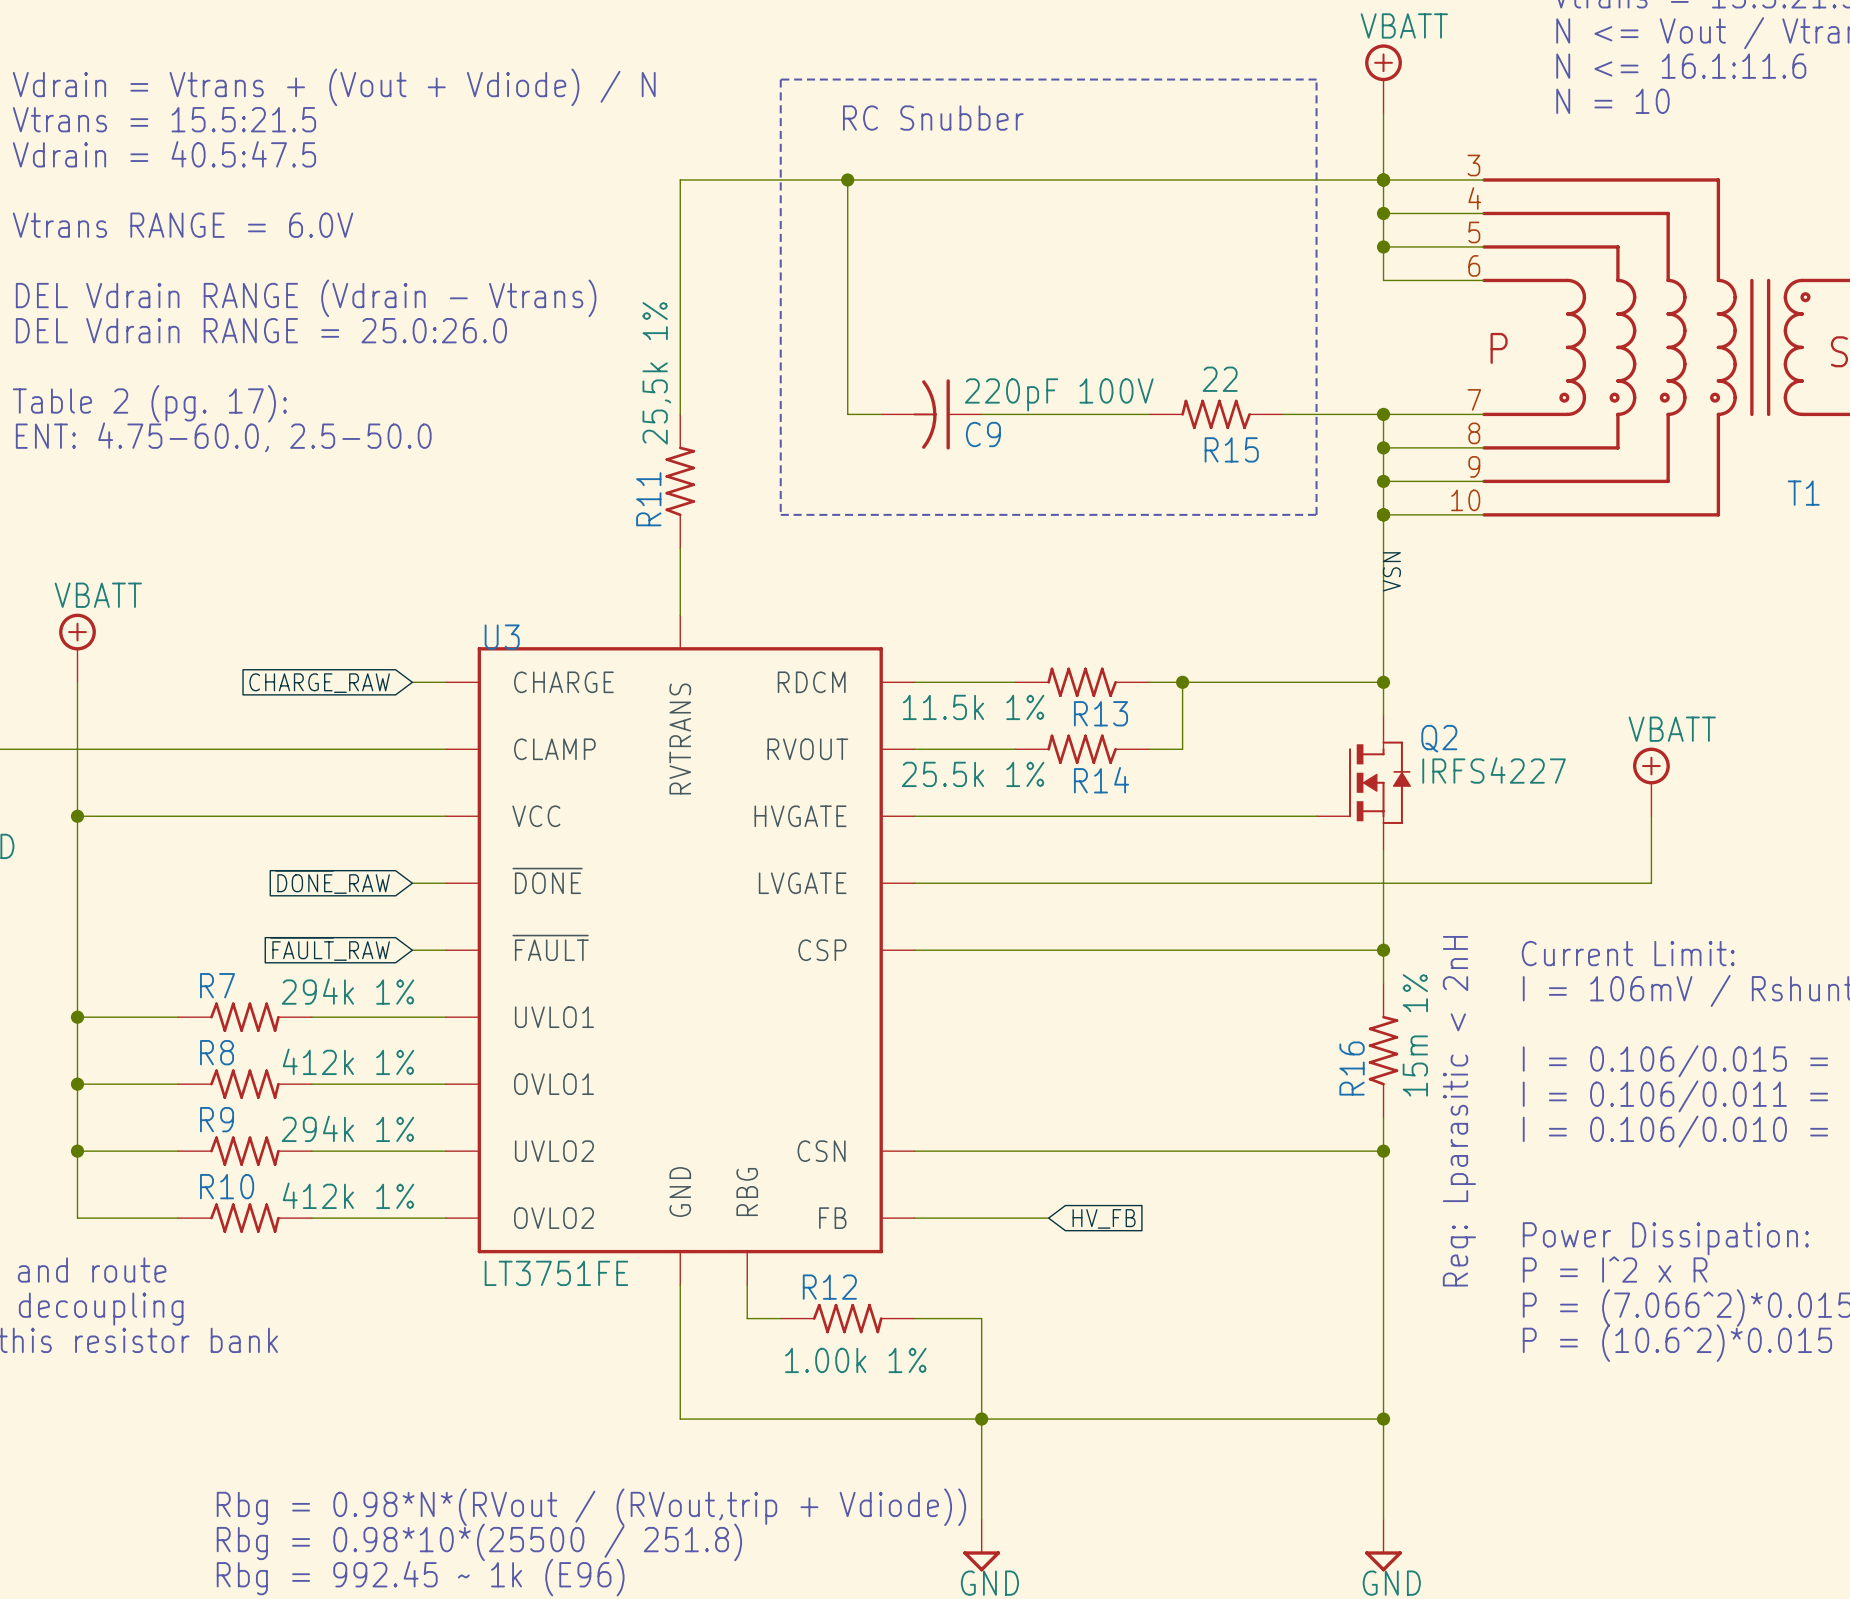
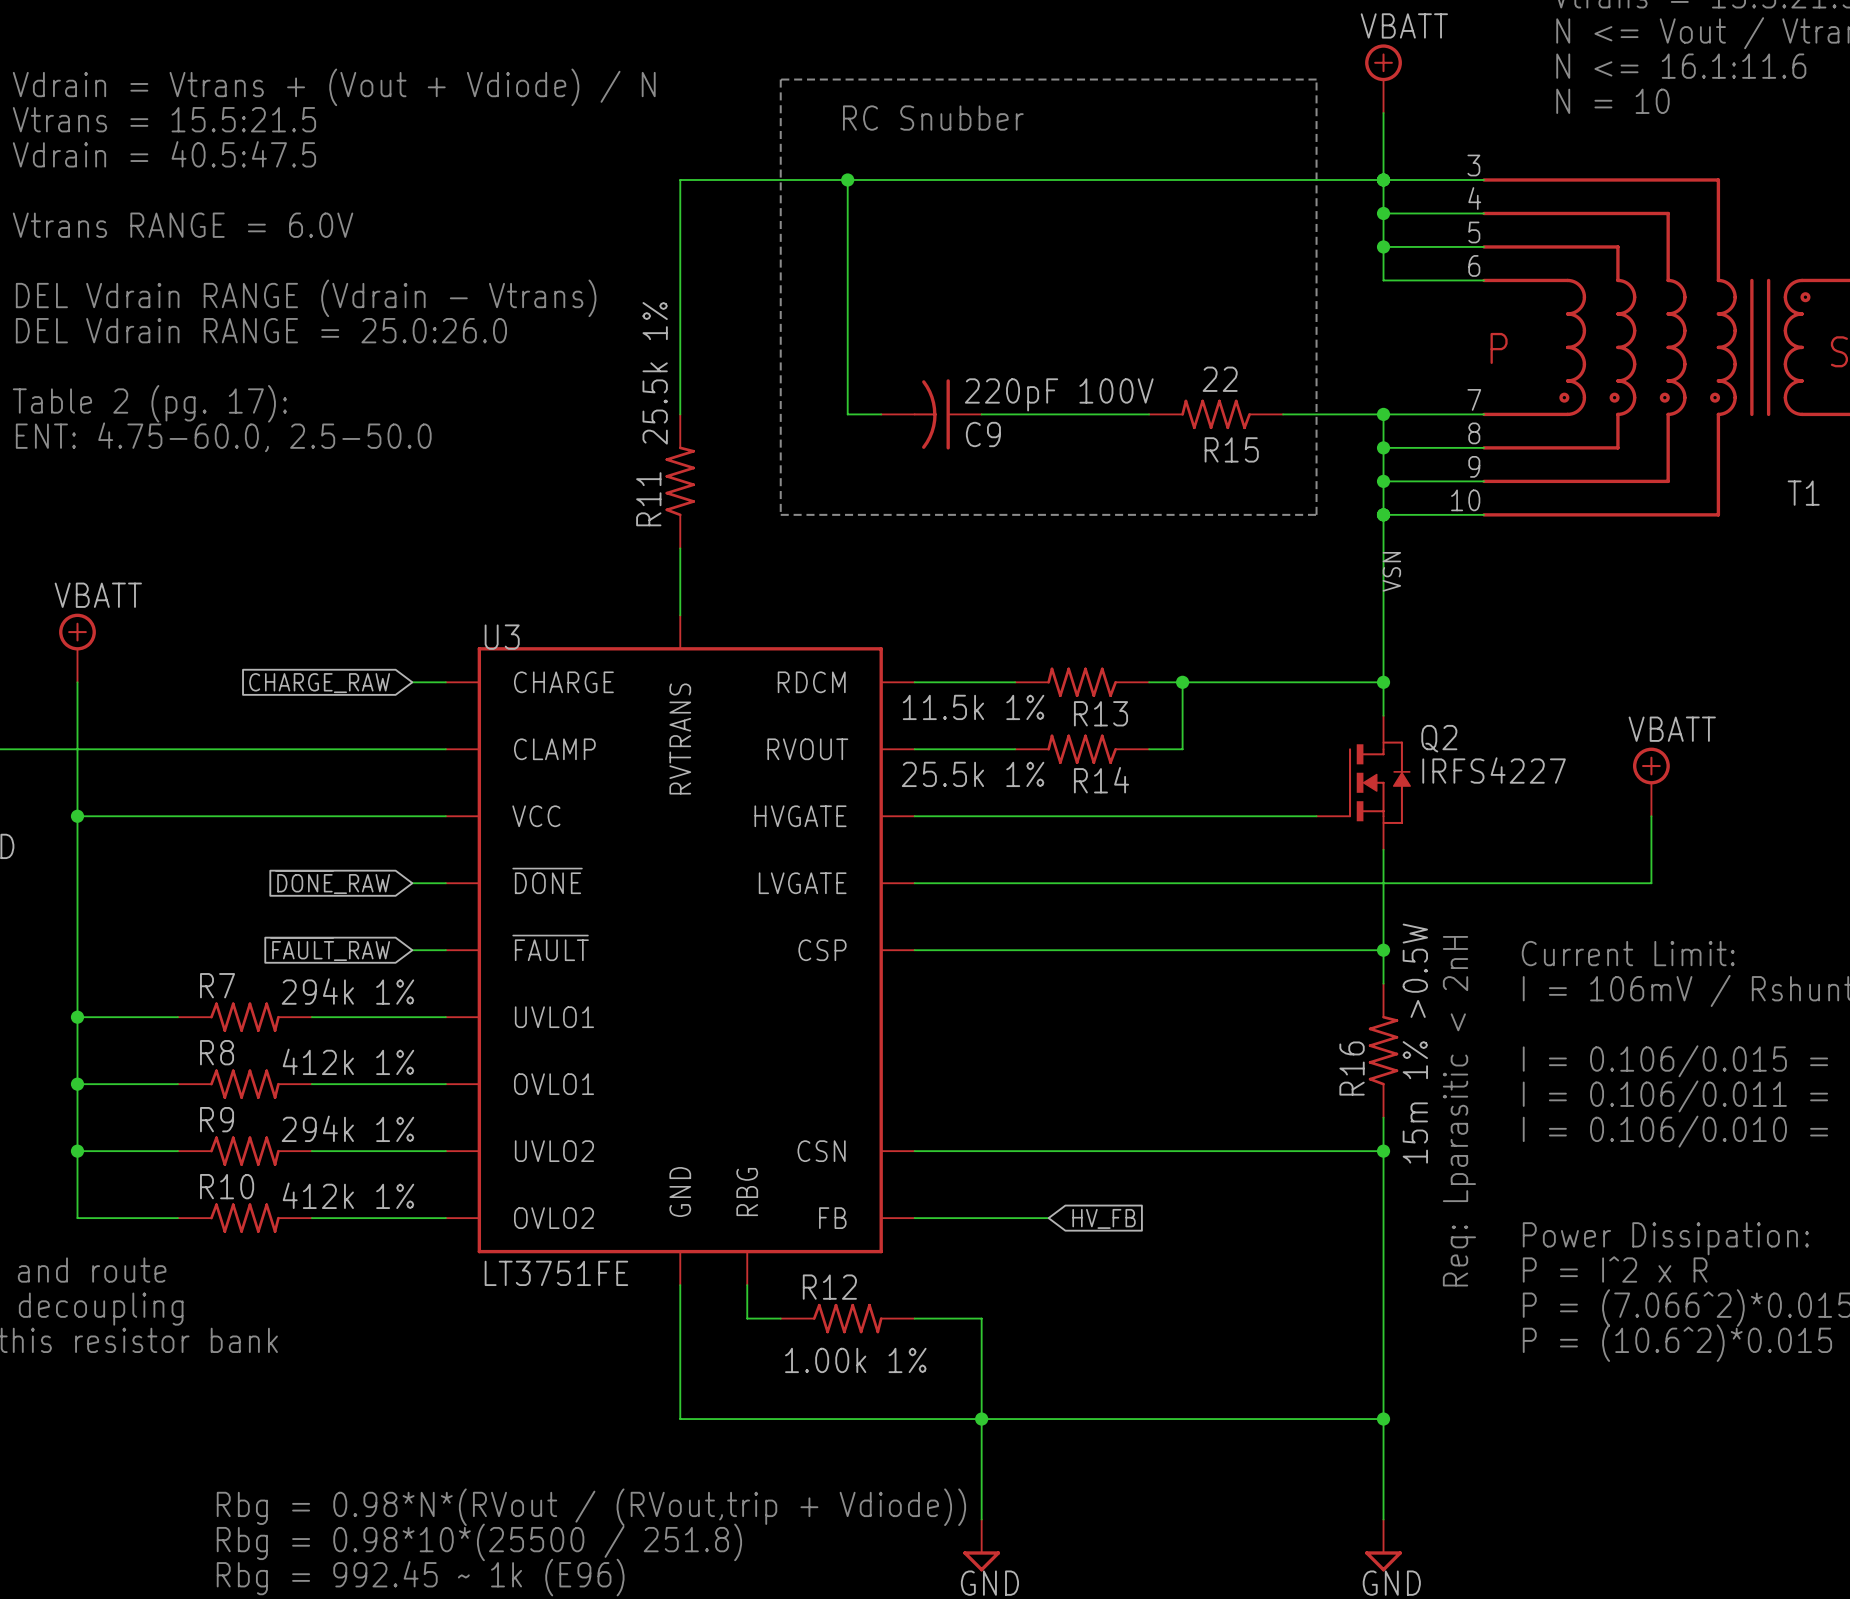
R11 value: 25,5k 1% (656, 373) -> 25.5k 1% (655, 373)
R16 value: 15m 1% (1415, 1035) -> 15m 1% >0.5W (1415, 1043)

